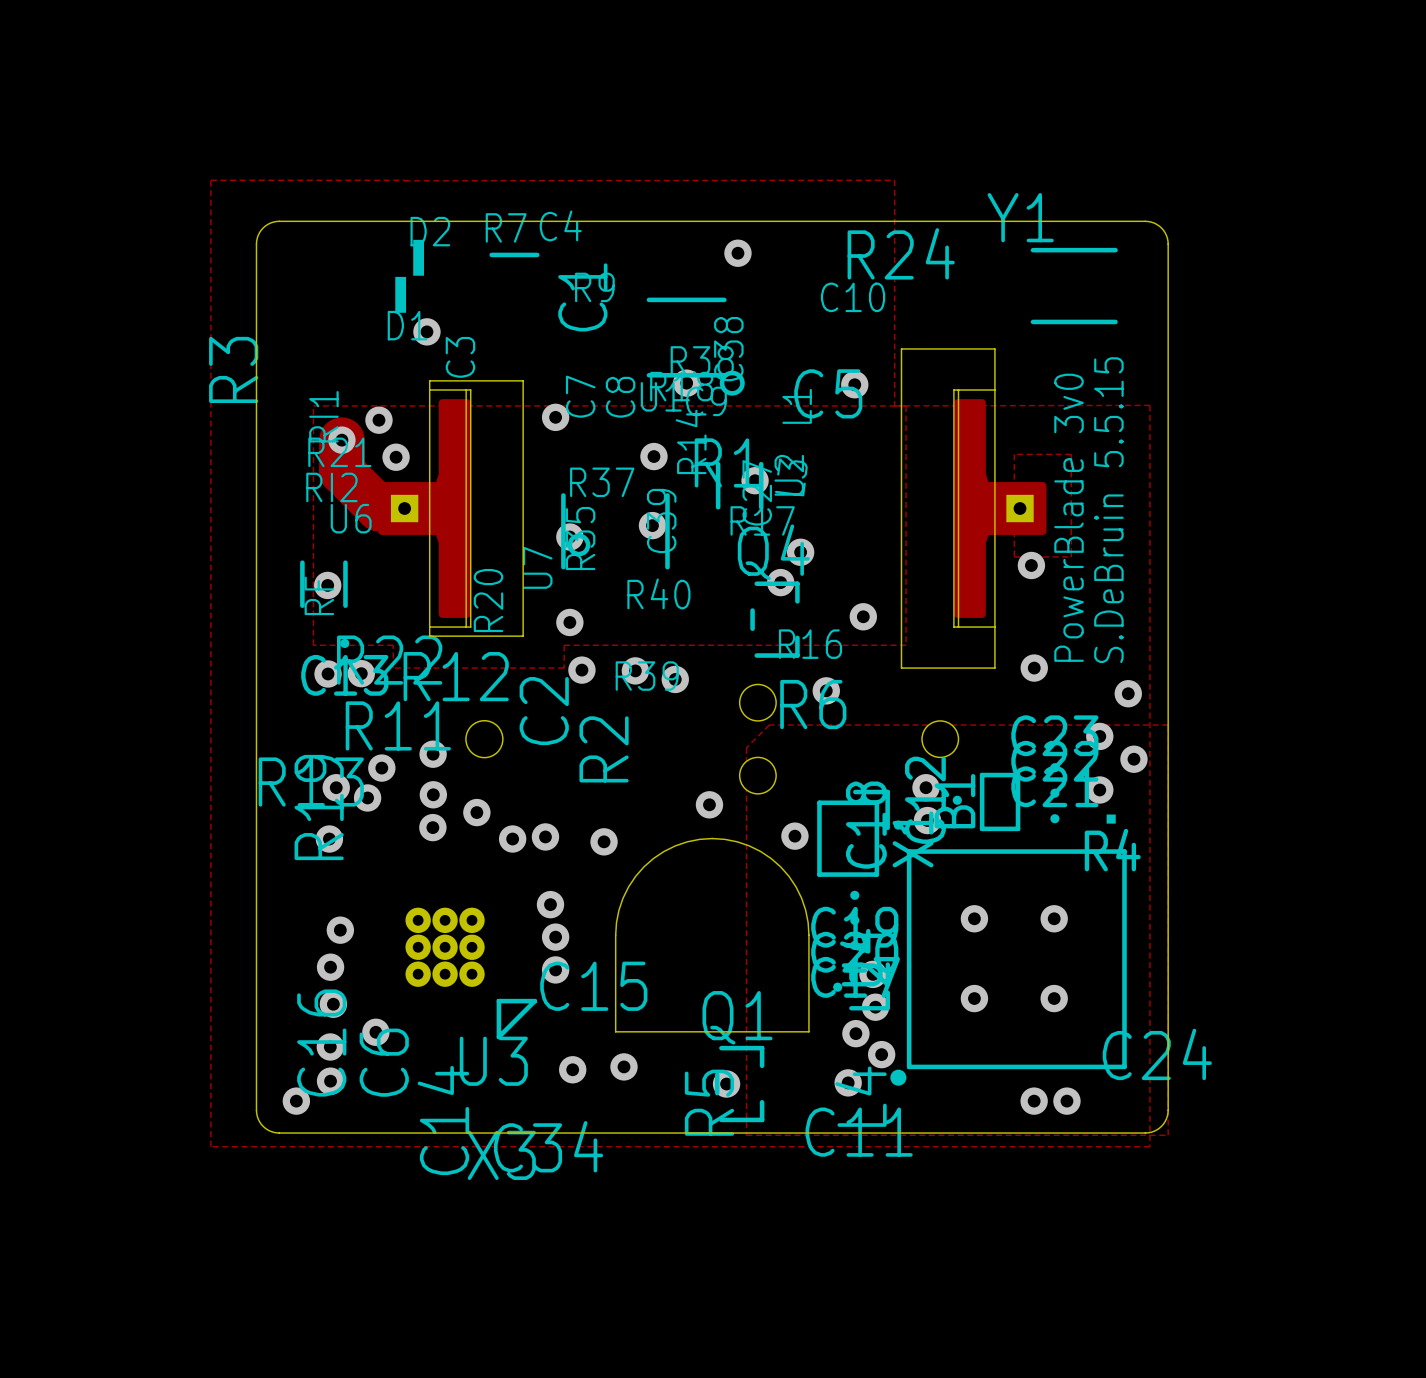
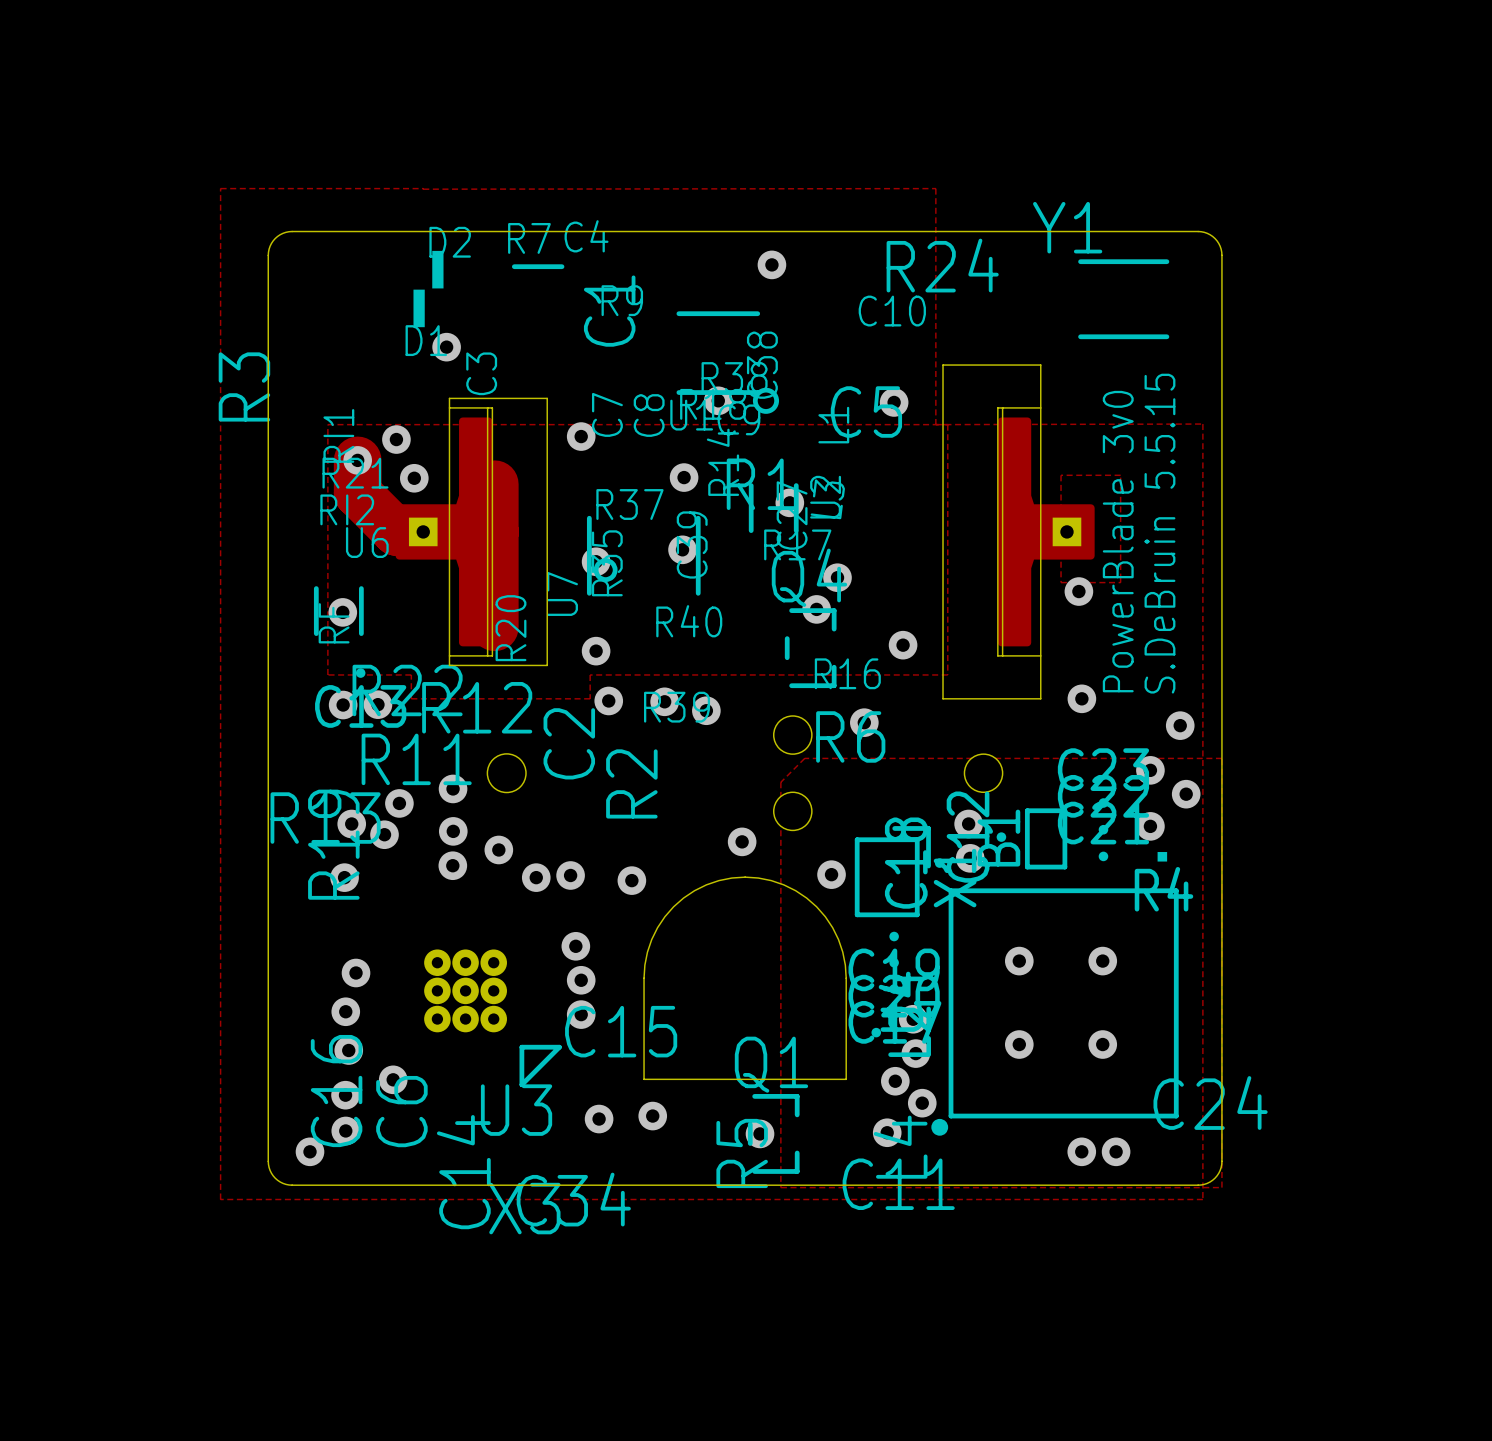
track: none -> (494, 484) (494, 627)

